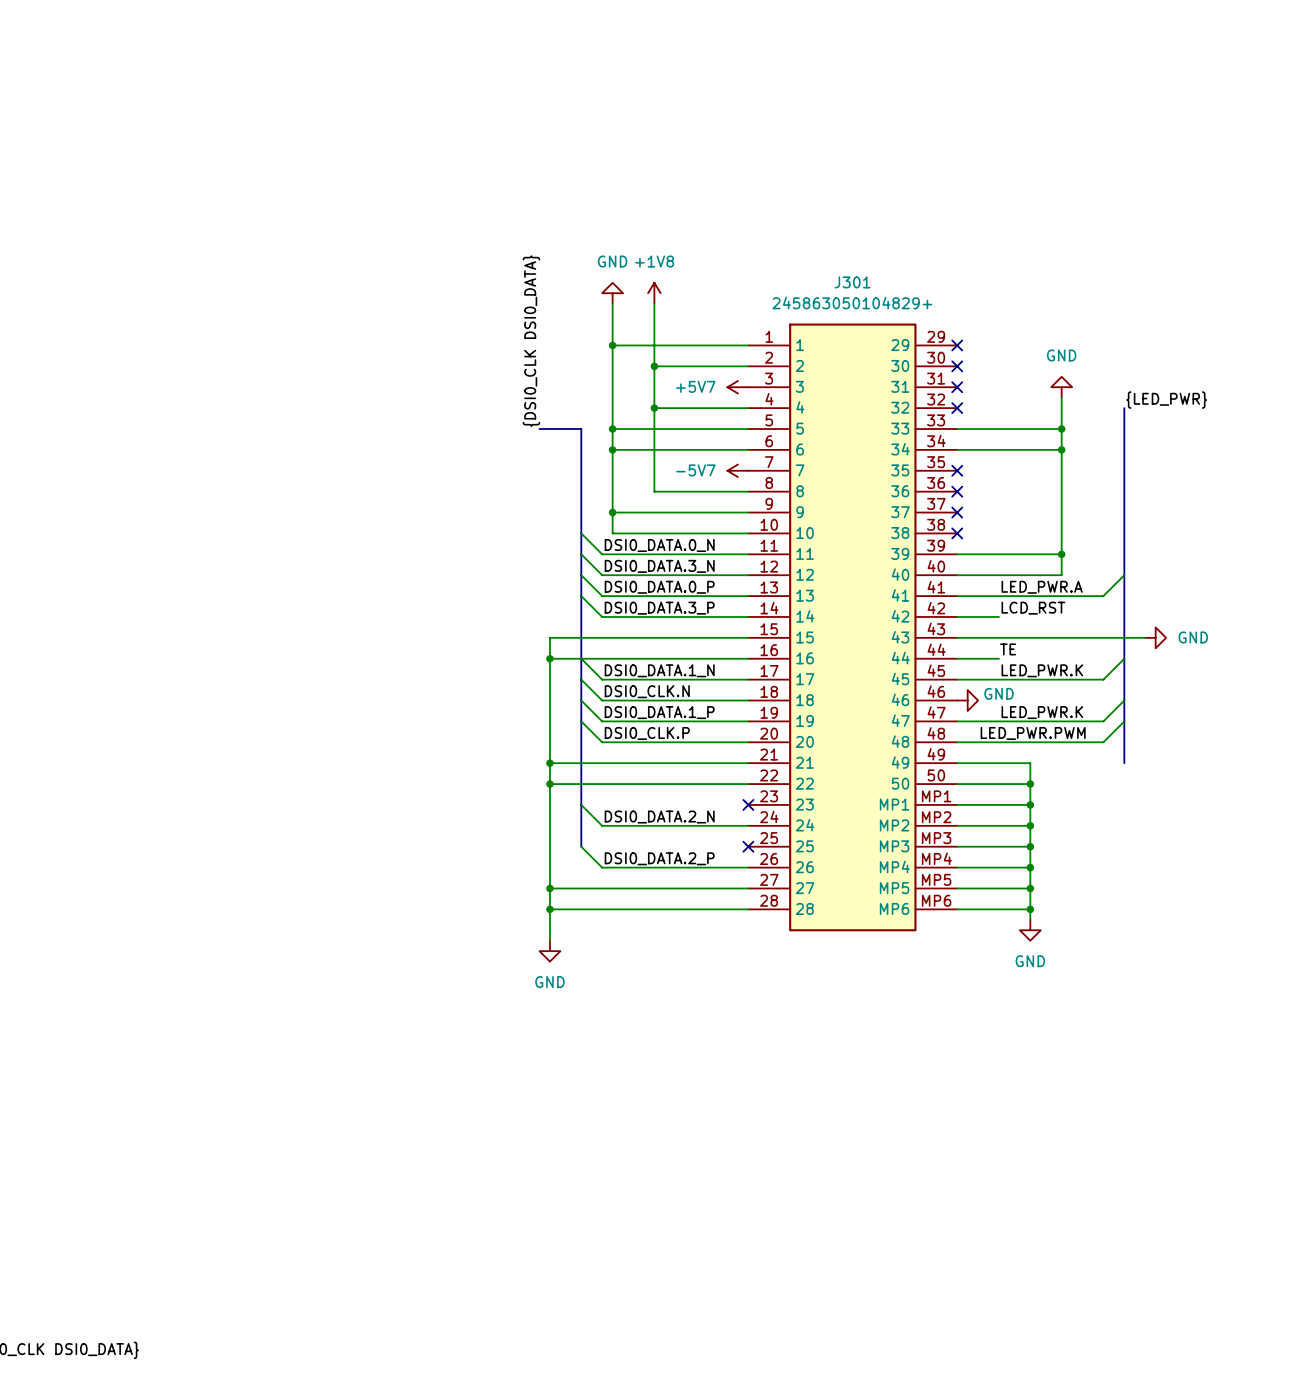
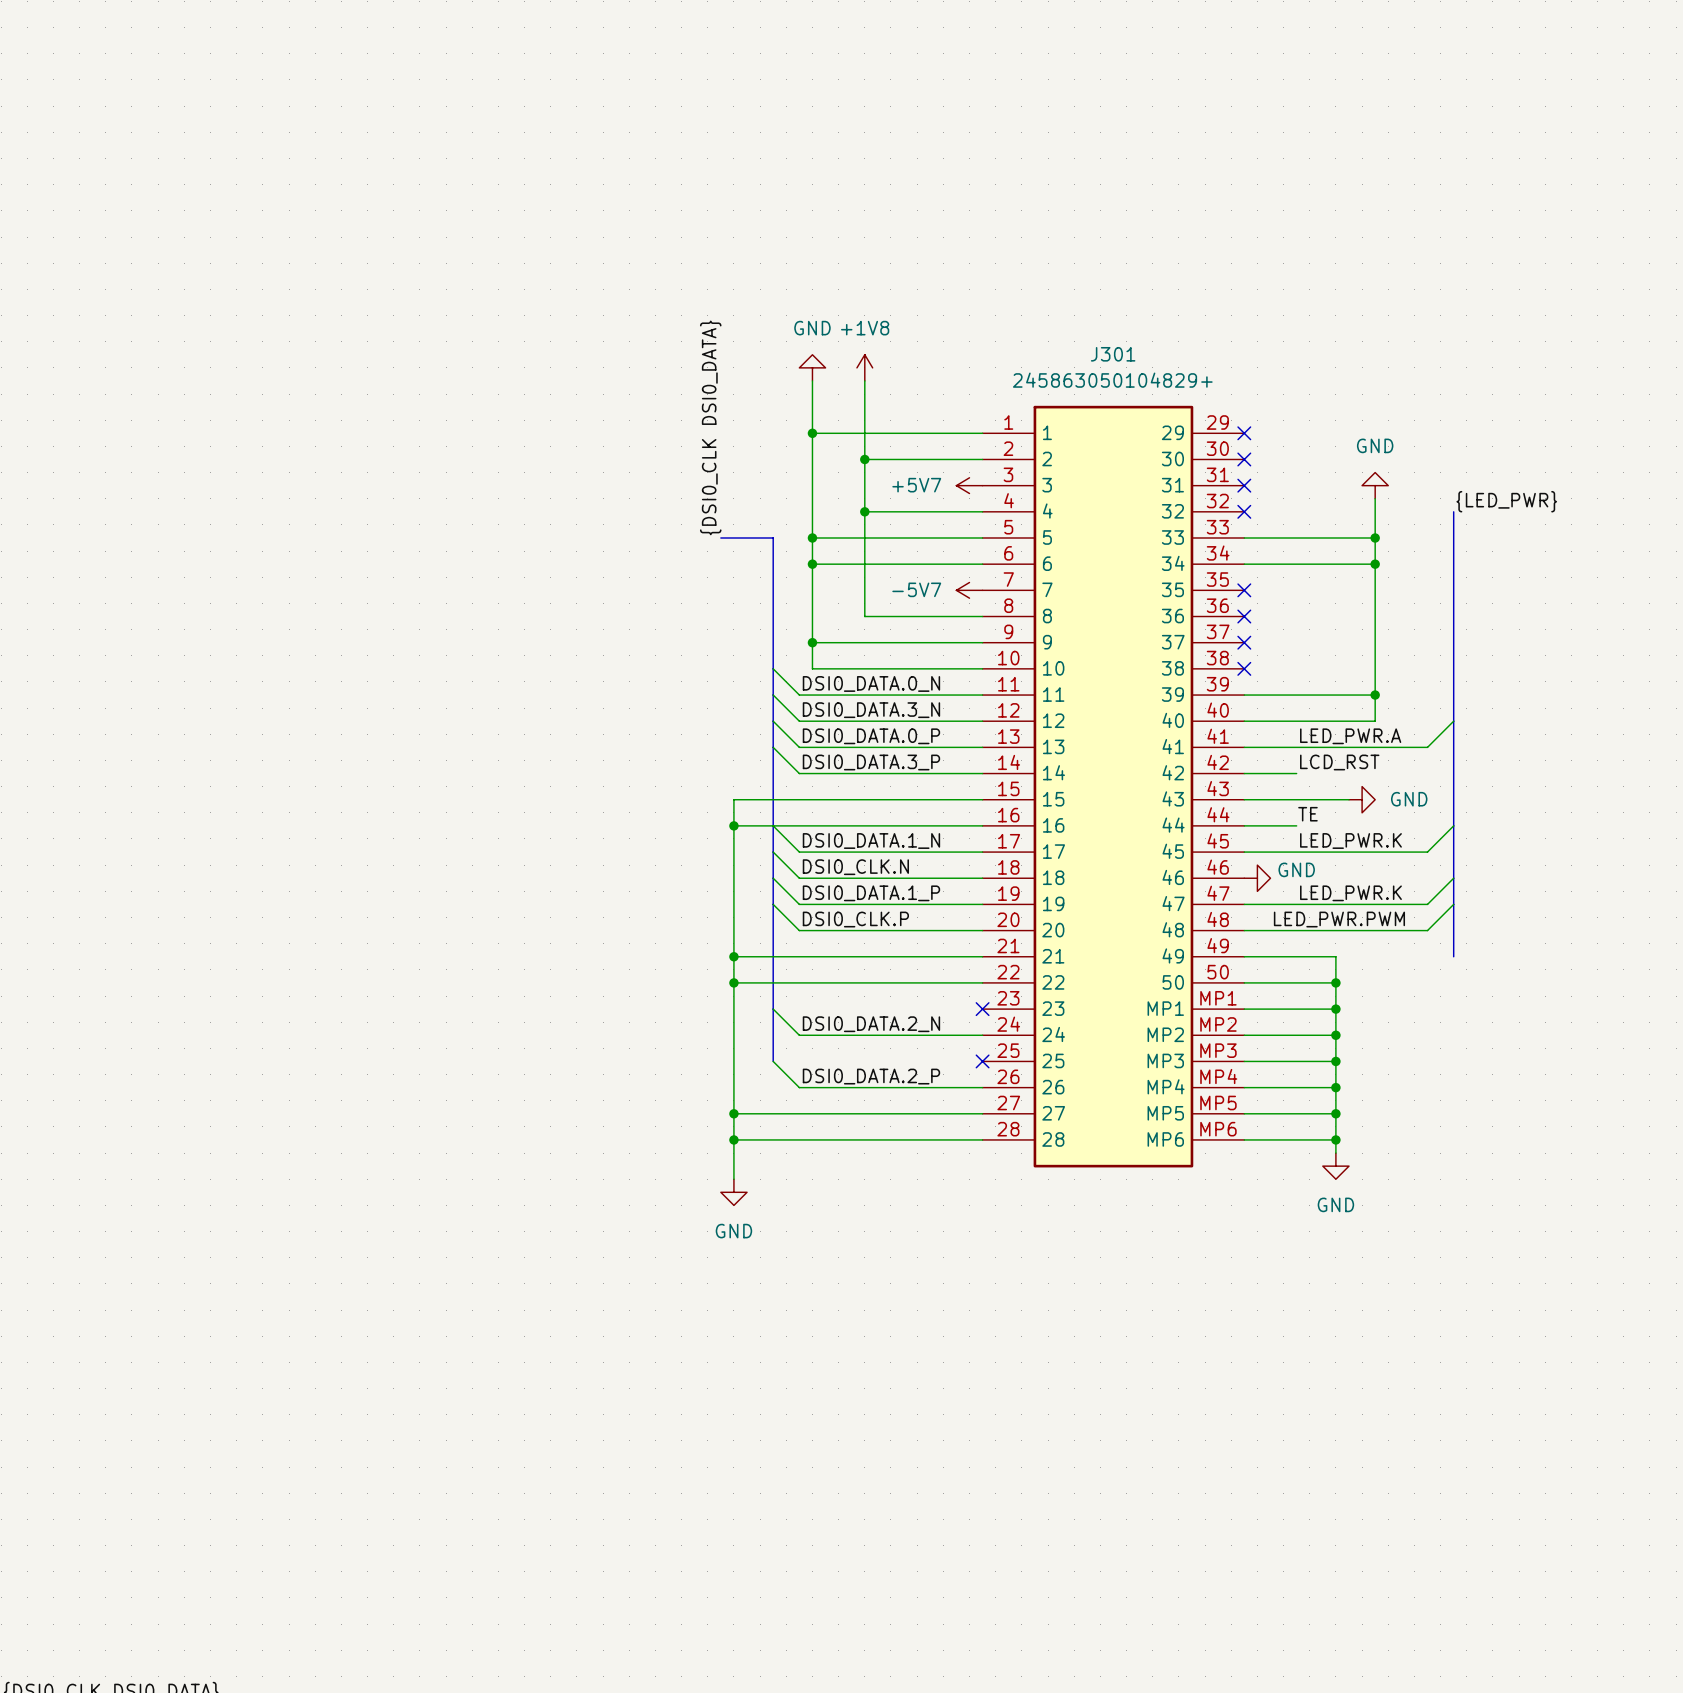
wire: (1040, 637) (1145, 637) -> none
power symbol position: GND (1155, 637) -> GND (1362, 799)

